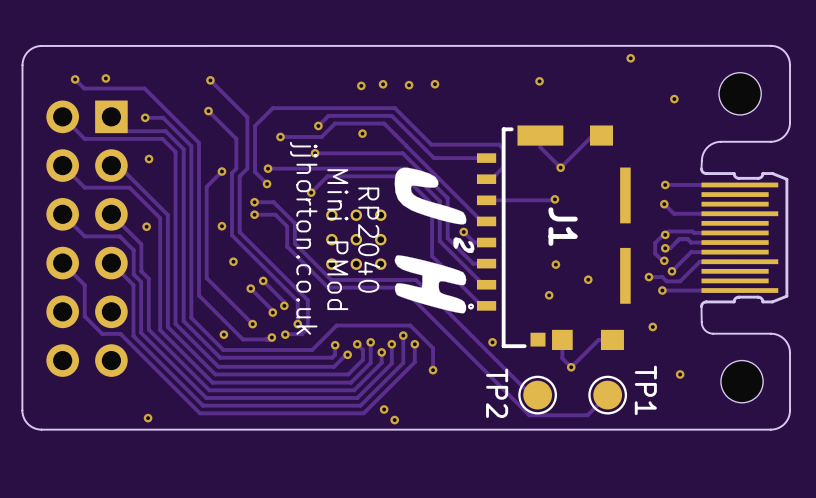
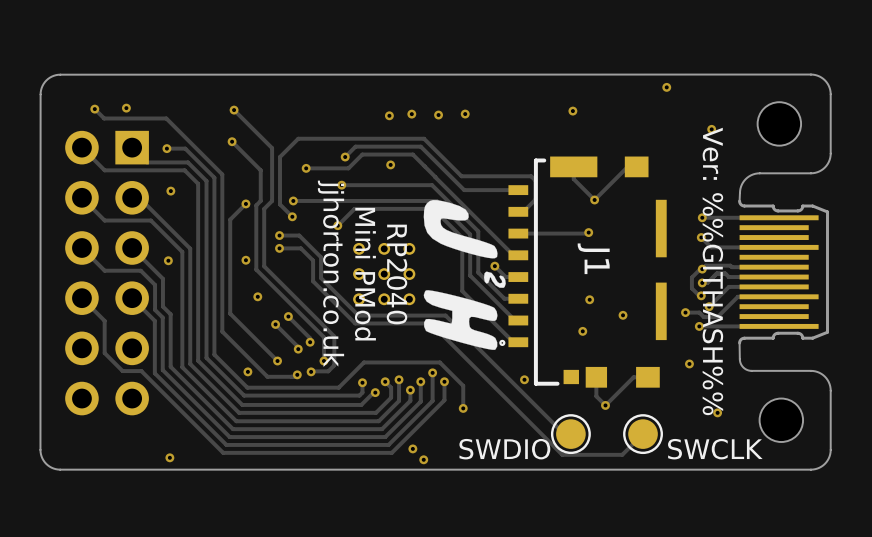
text: none -> Ver: %%GITHASH%% (712, 271)
TP1 name: TP1 (645, 390) -> none
TP2 name: TP2 (497, 393) -> none
text: none -> SWDIO (504, 449)
text: none -> SWCLK (715, 449)

